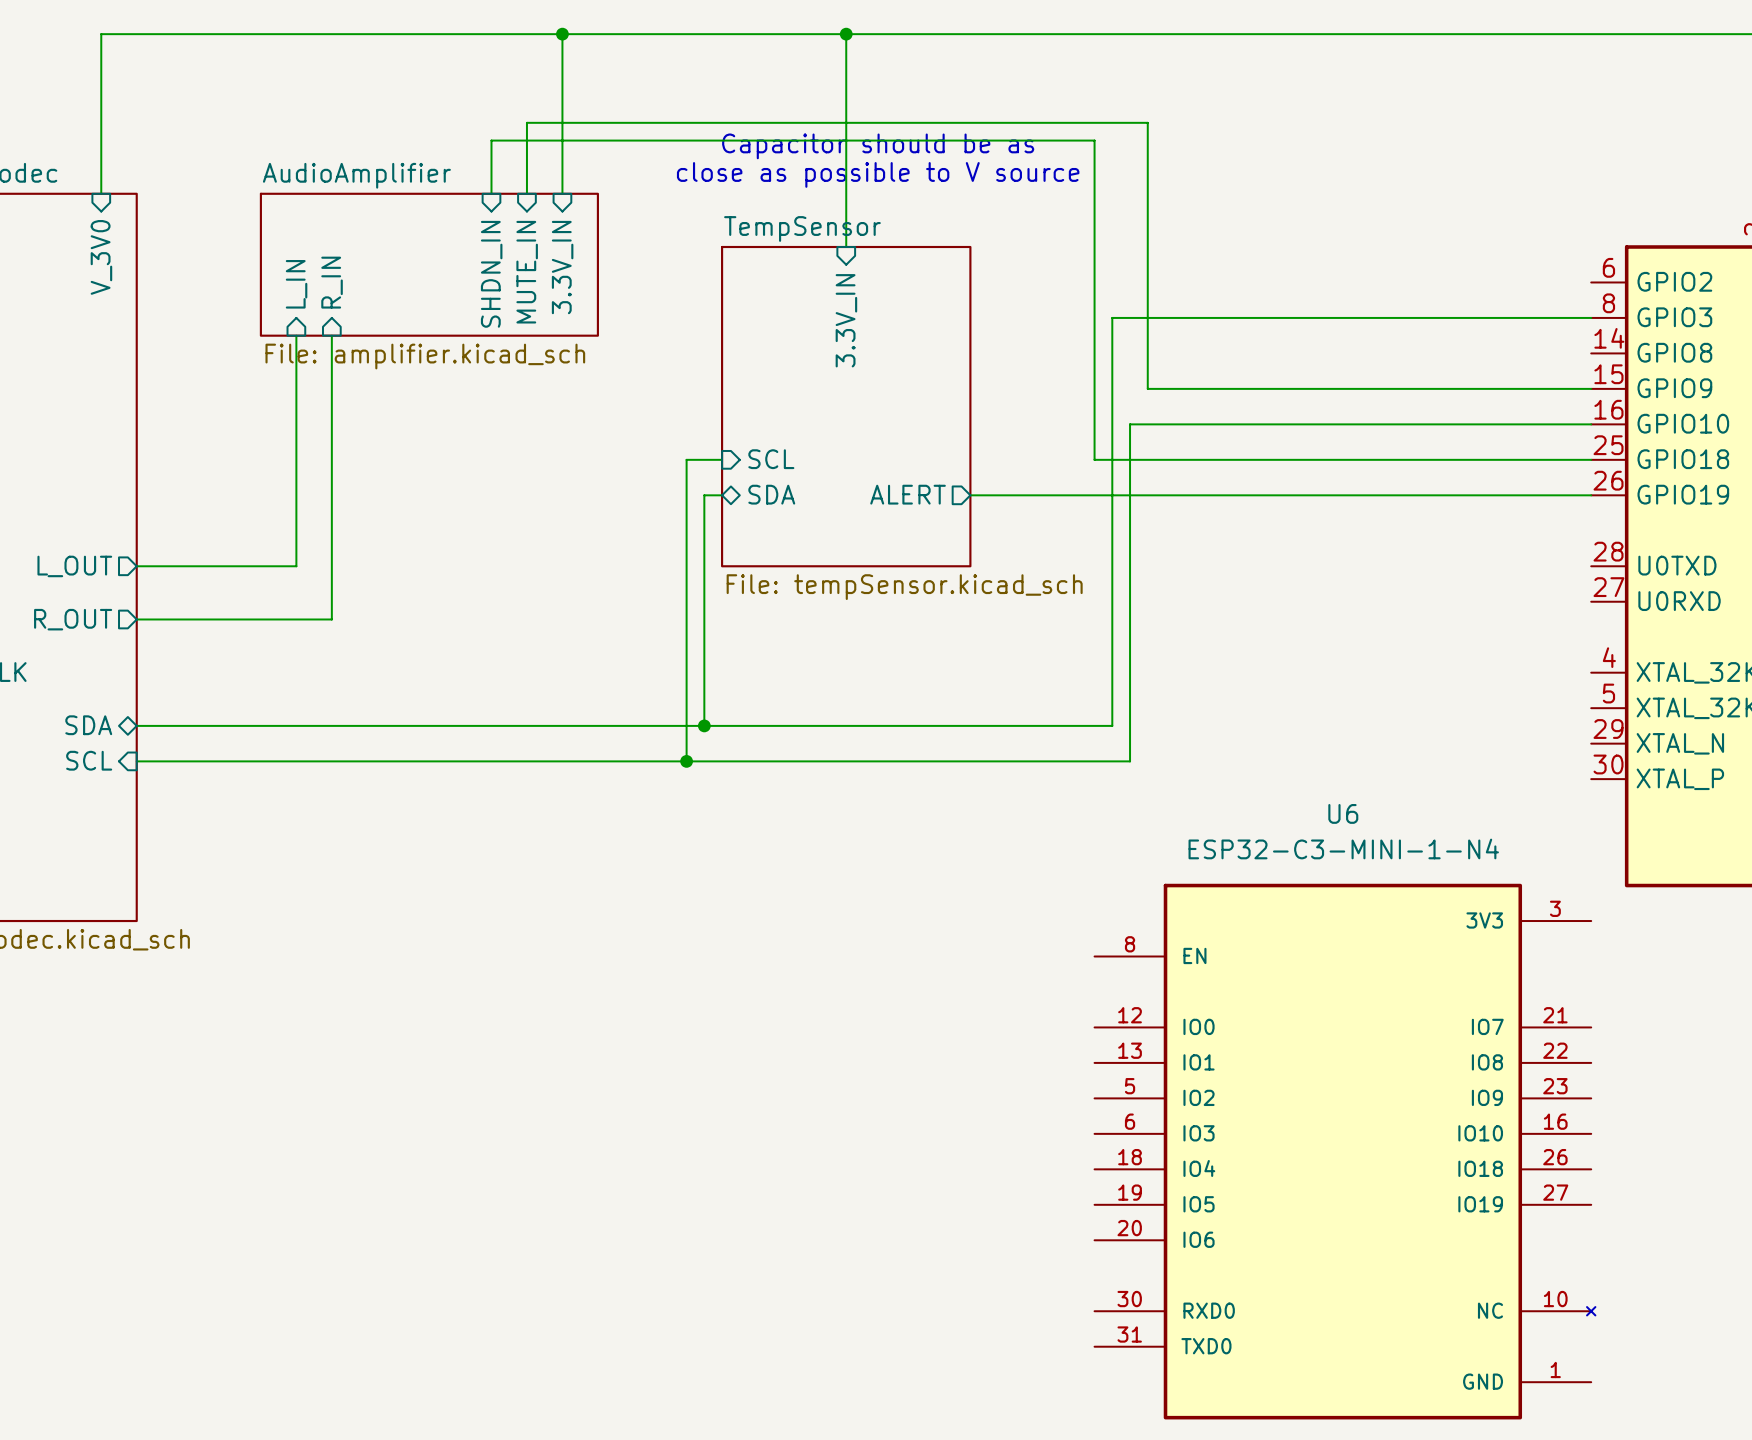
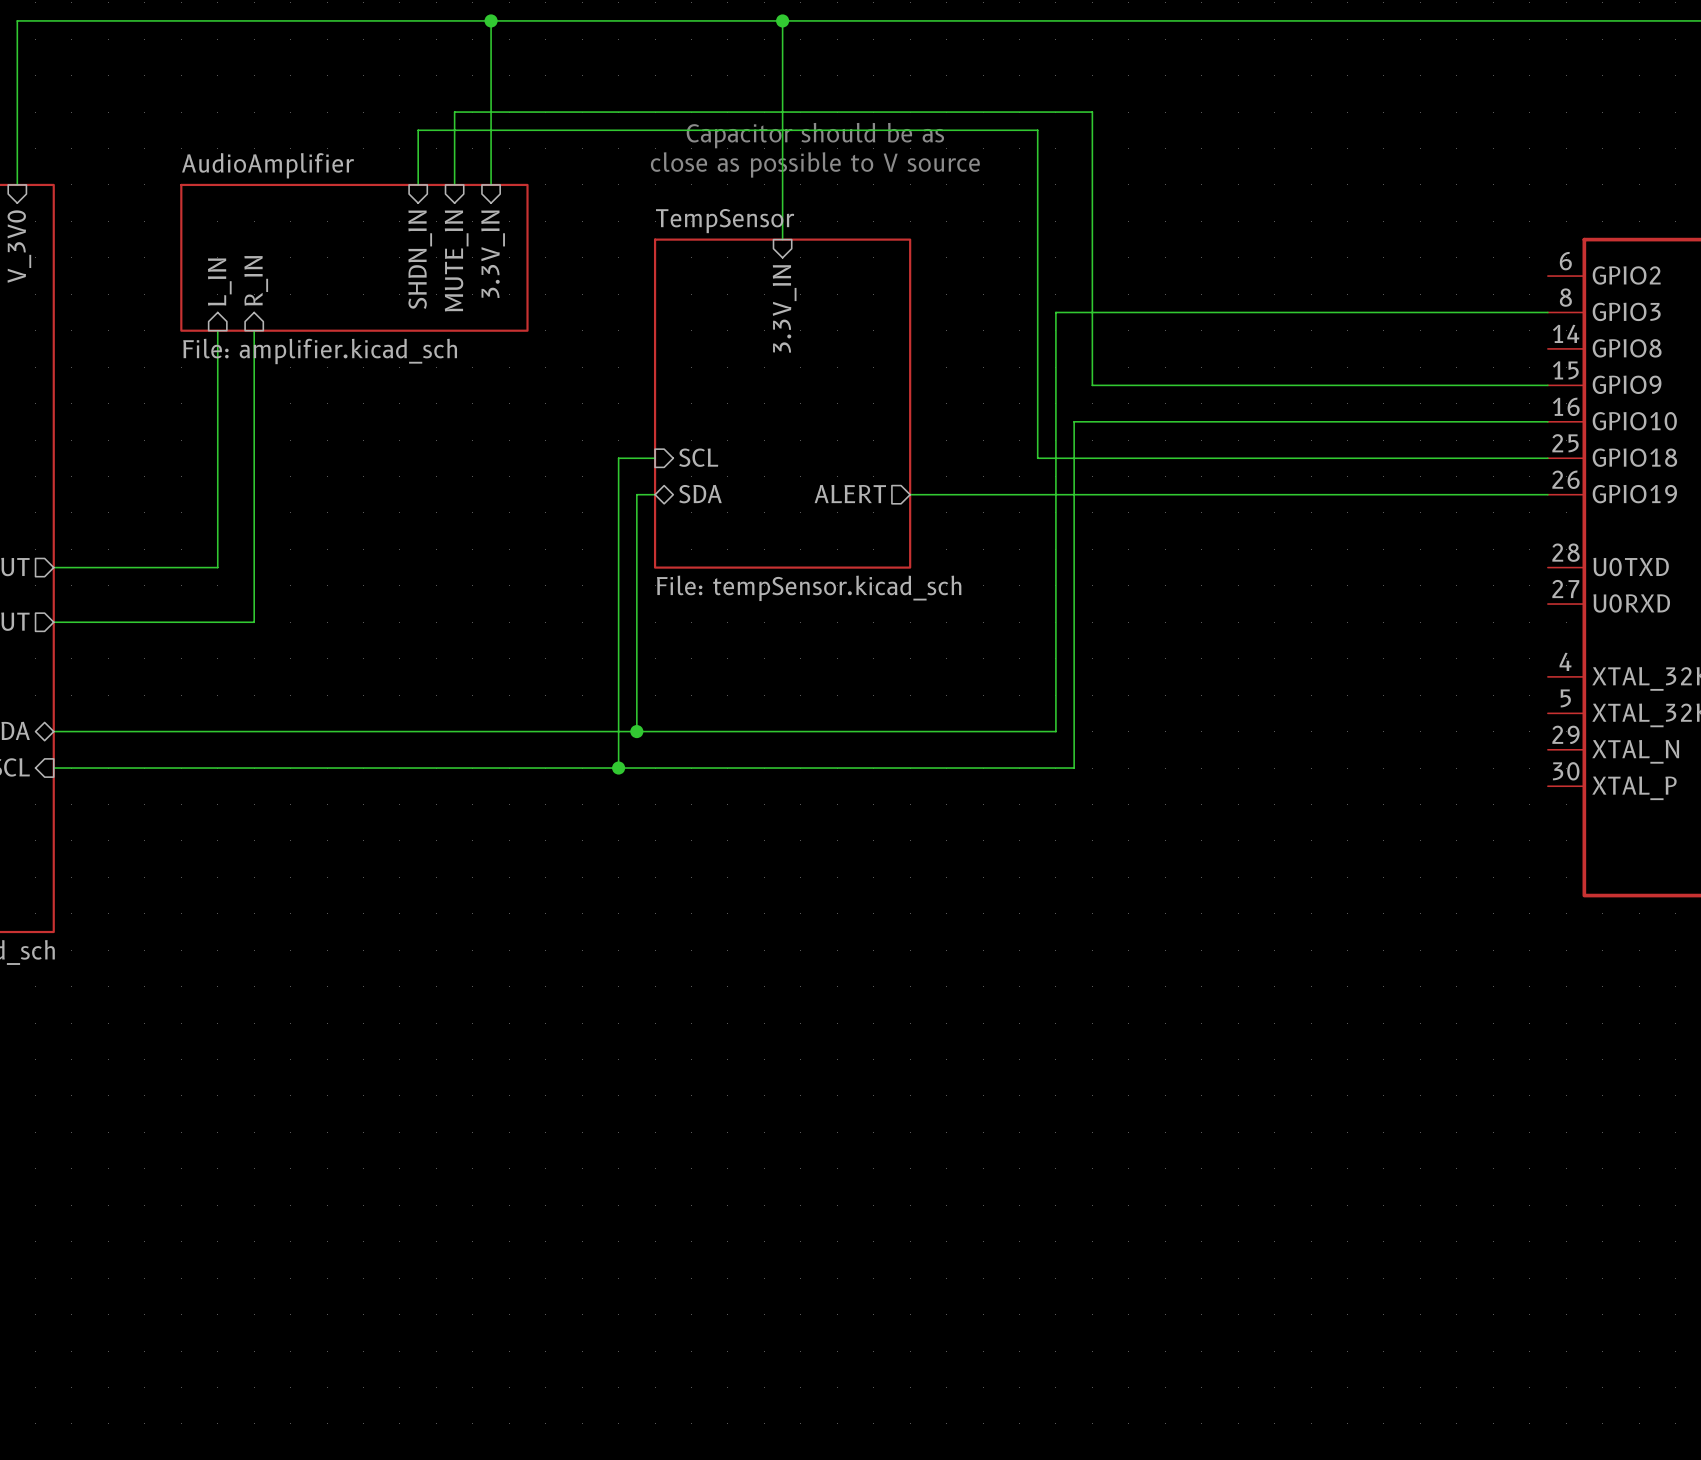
U6: ESP32-C3-MINI-1-N4 (1344, 1151) -> none

